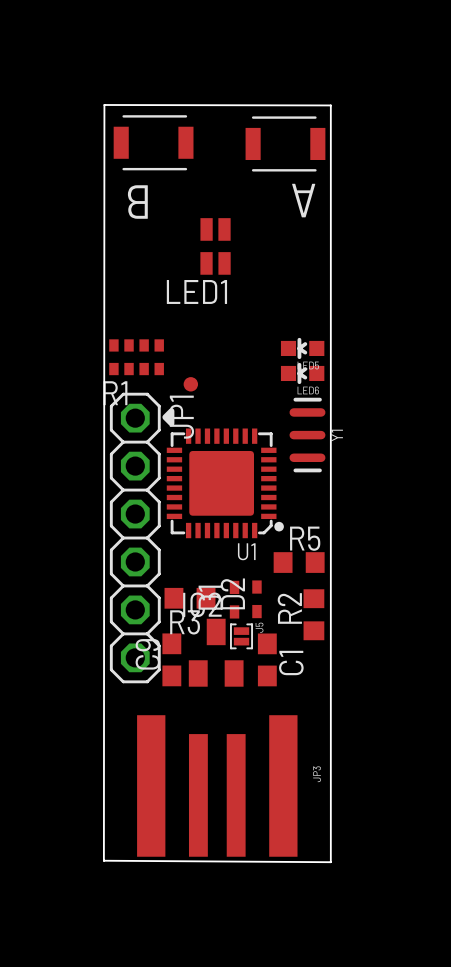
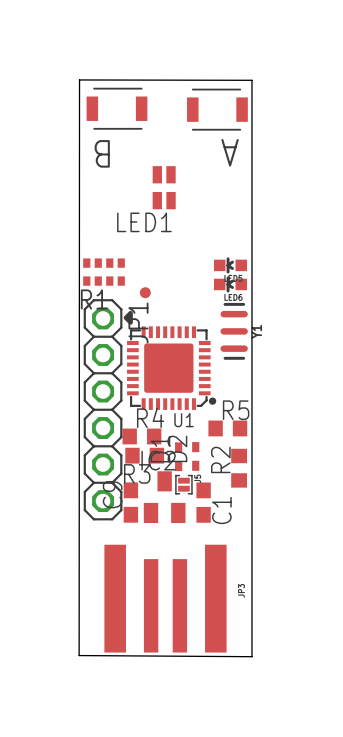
R4: none -> (141, 436)

